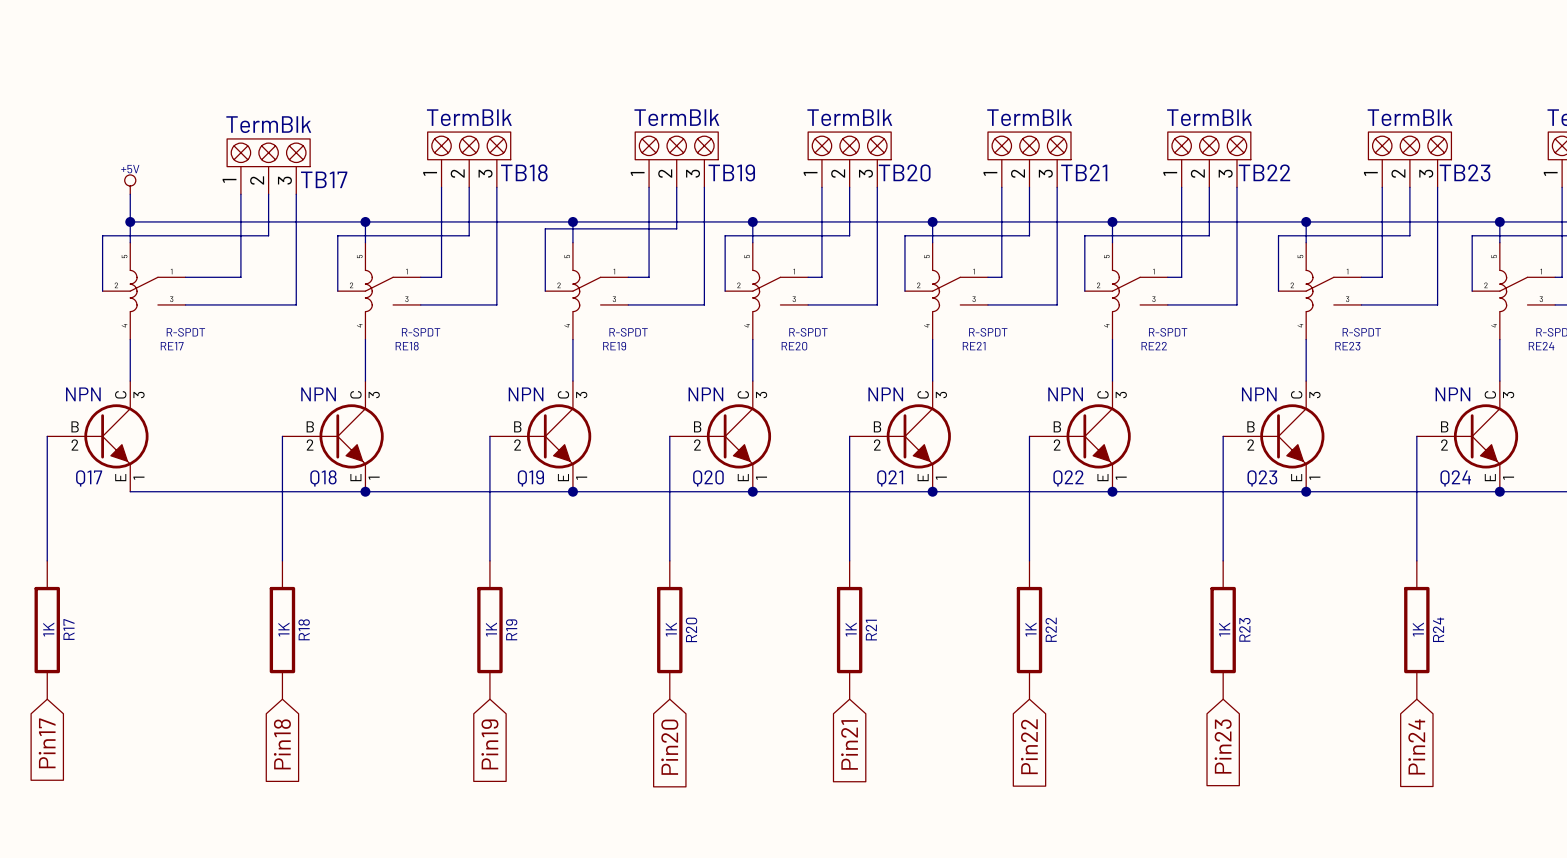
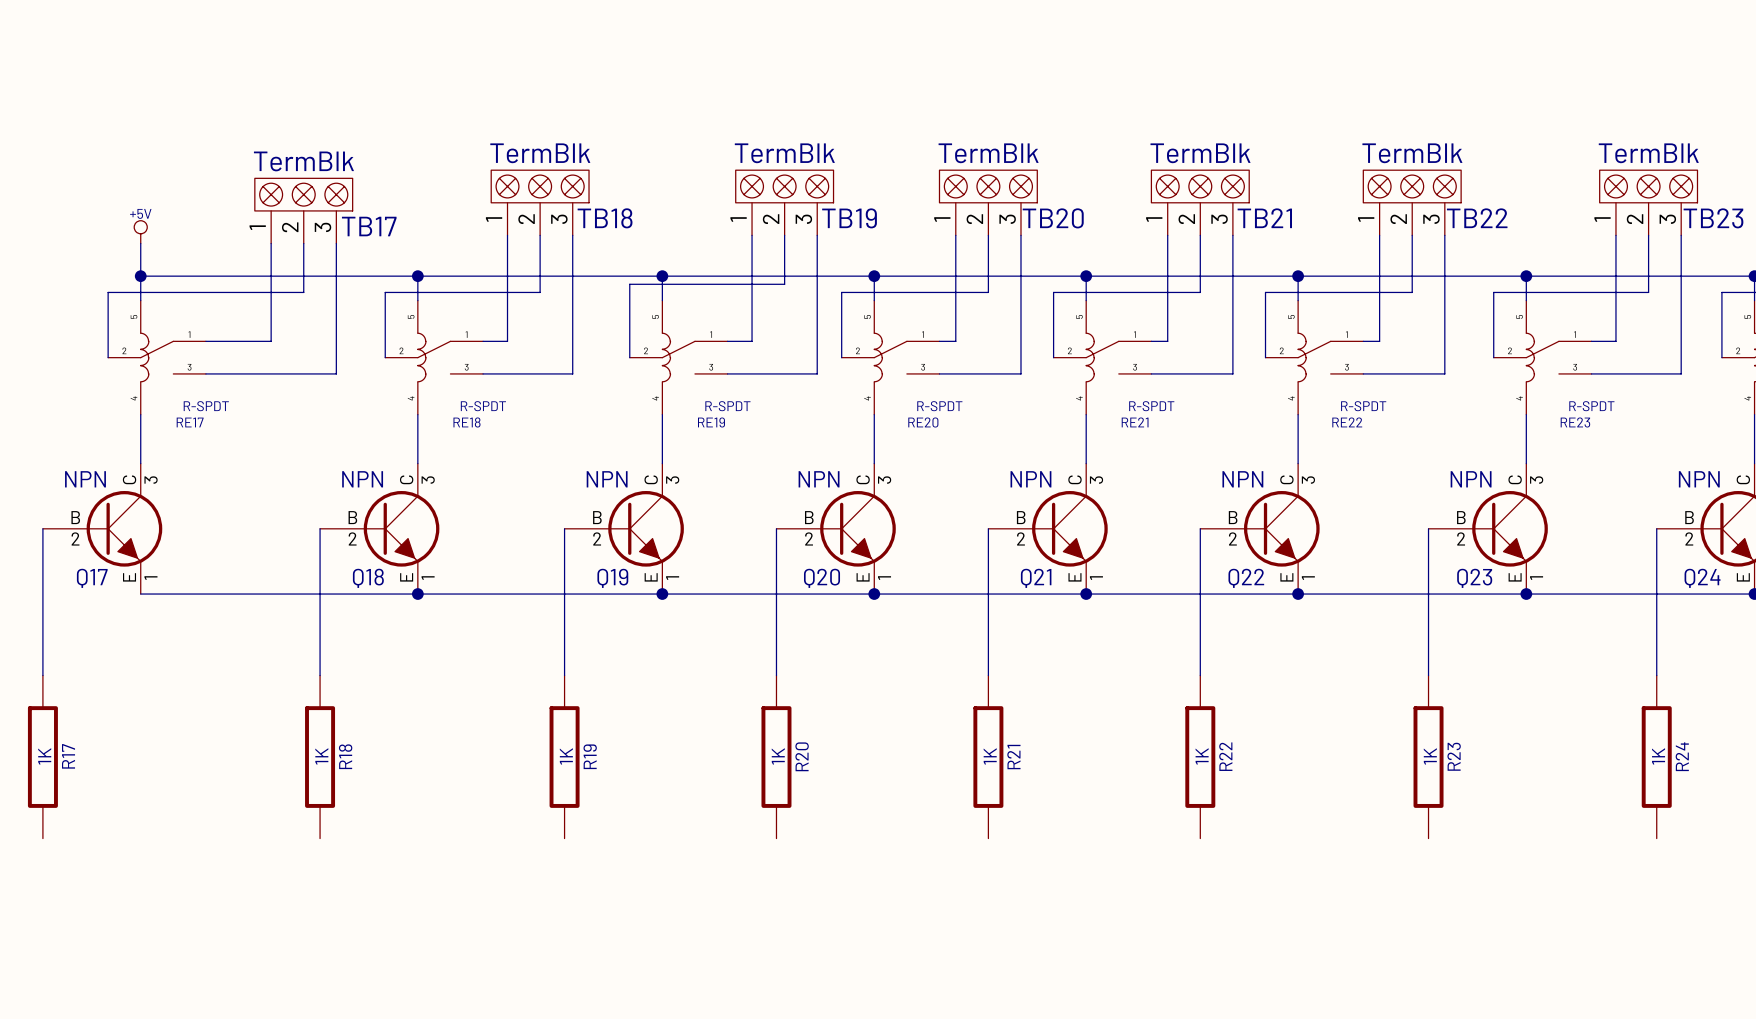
global label: Pin17 (47, 743) -> none
global label: Pin18 (282, 744) -> none
global label: Pin19 (489, 744) -> none
global label: Pin21 (849, 744) -> none
global label: Pin22 (1029, 746) -> none
global label: Pin23 (1223, 746) -> none
global label: Pin24 (1416, 746) -> none
global label: Pin20 (669, 747) -> none

